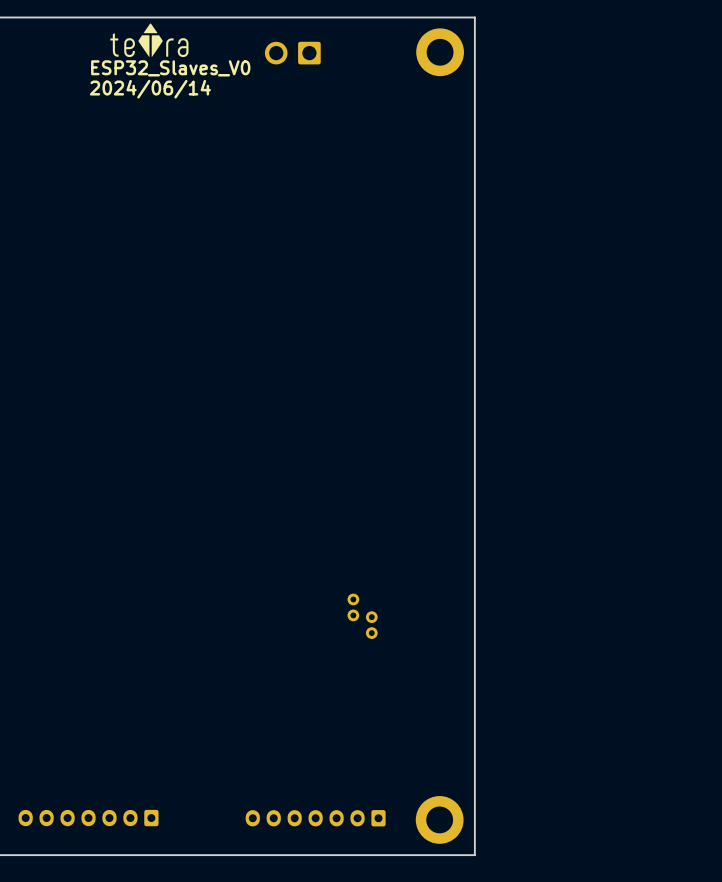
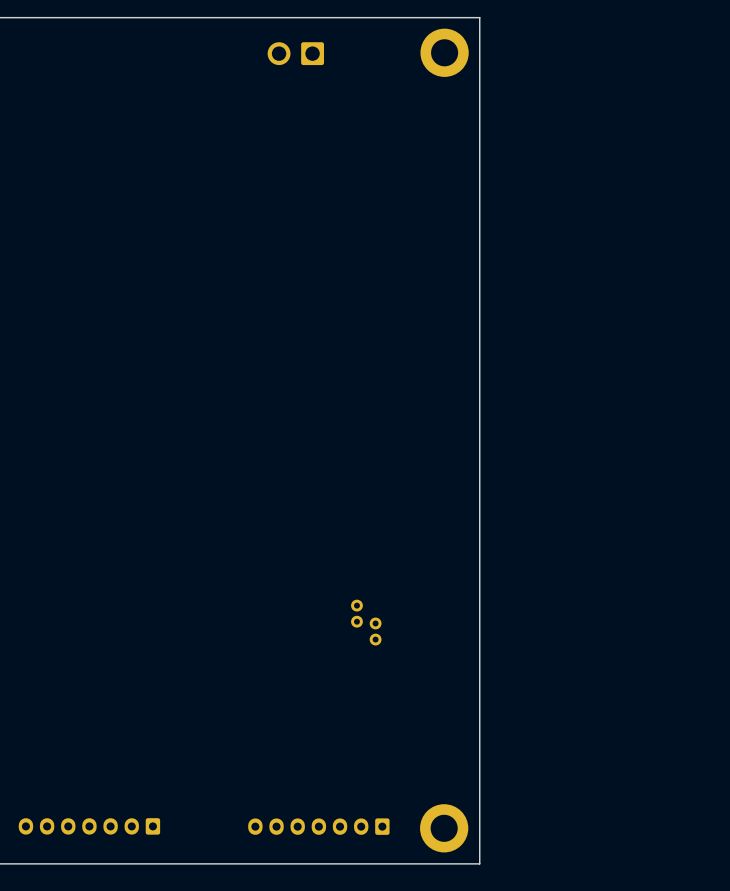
drawing: [110, 23, 189, 58] -> none
text: ESP32_Slaves_V0 (170, 68) -> none
text: 2024/06/14 (150, 89) -> none

